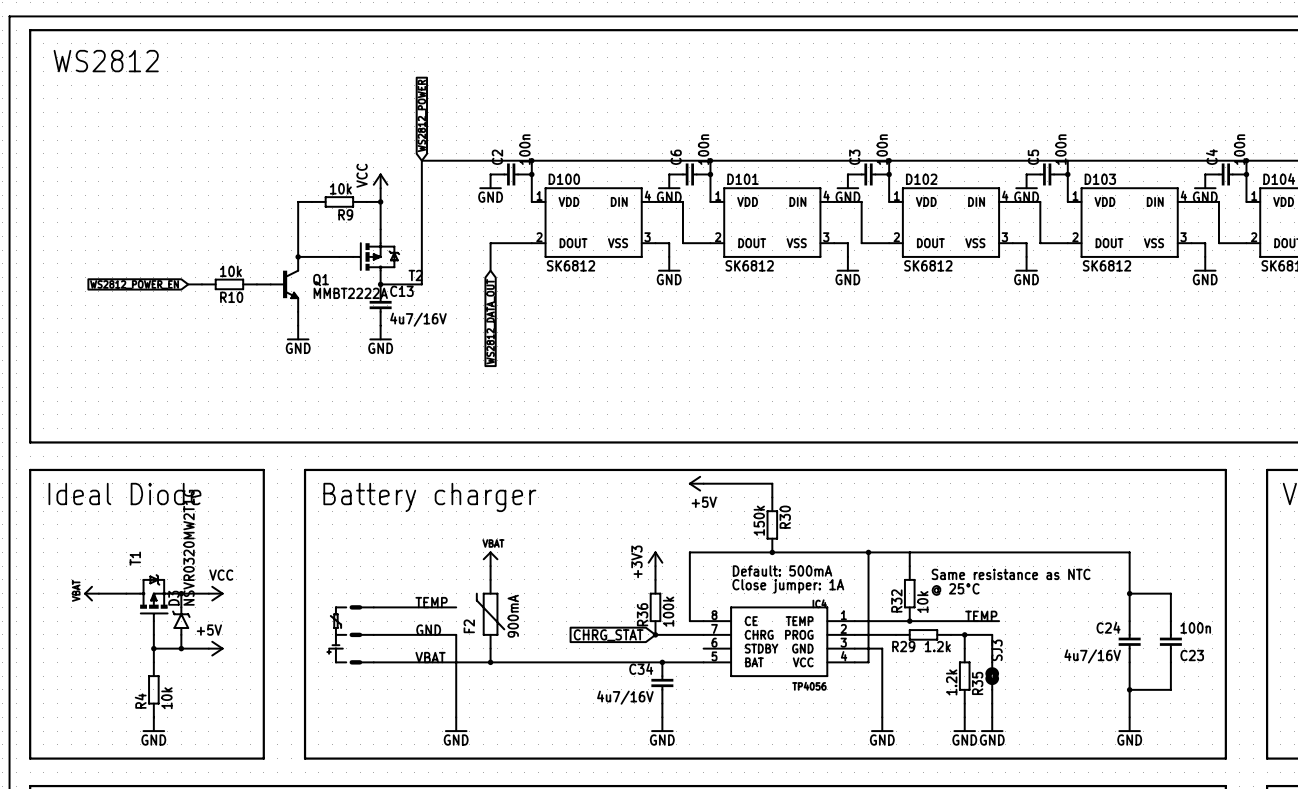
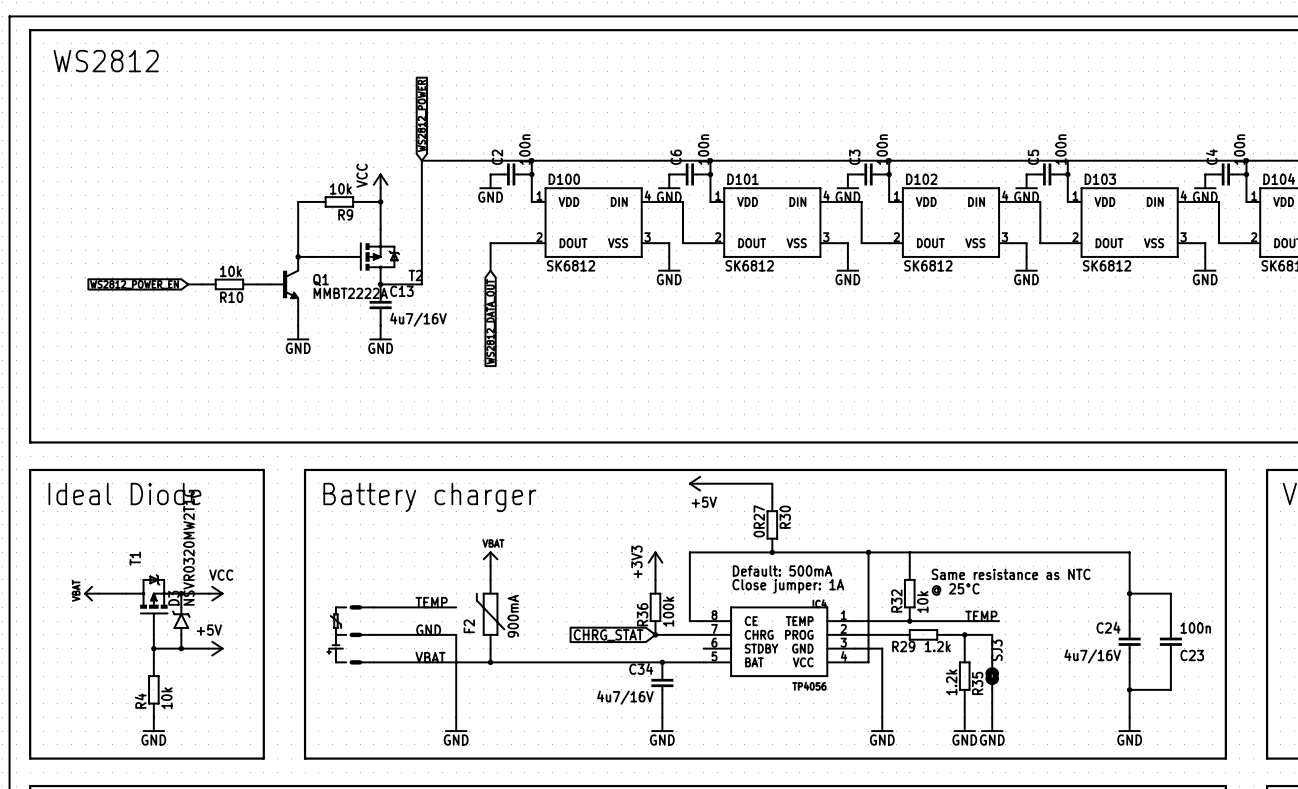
R30 value: 150k (759, 520) -> 0R27 (759, 521)

